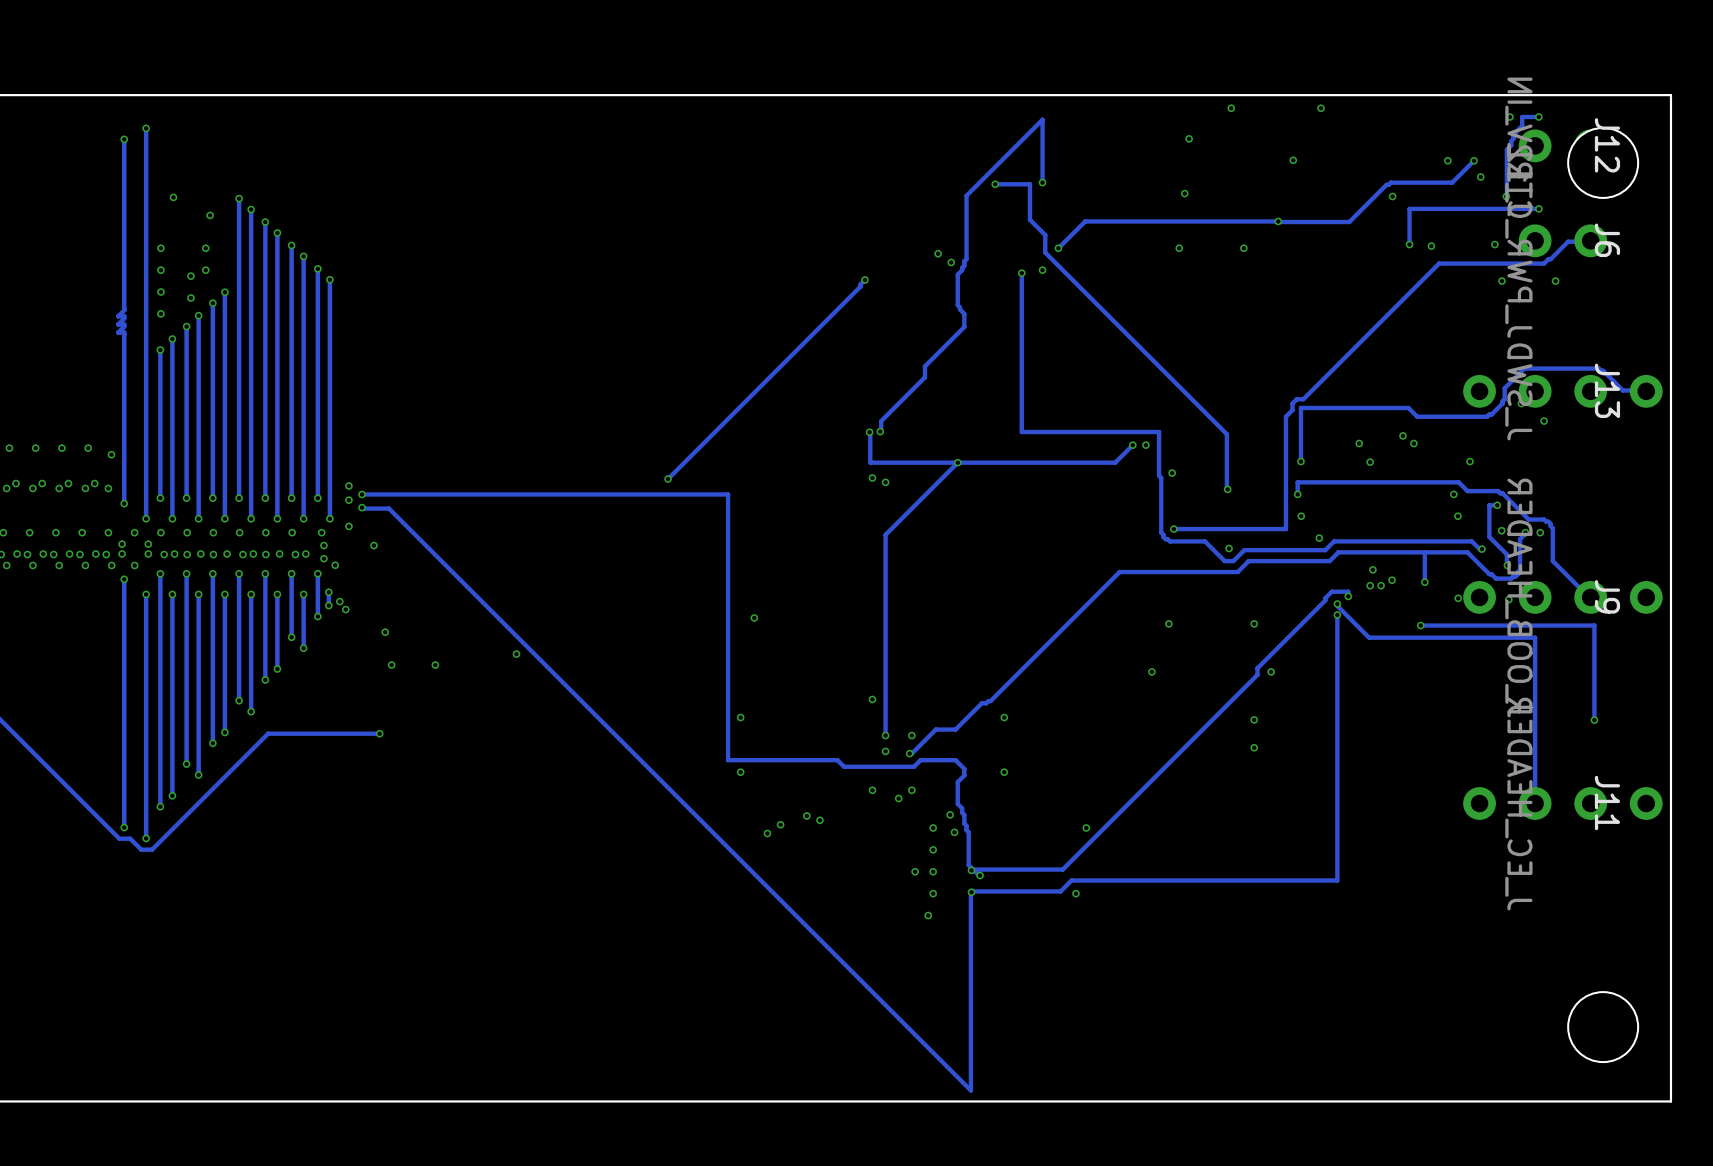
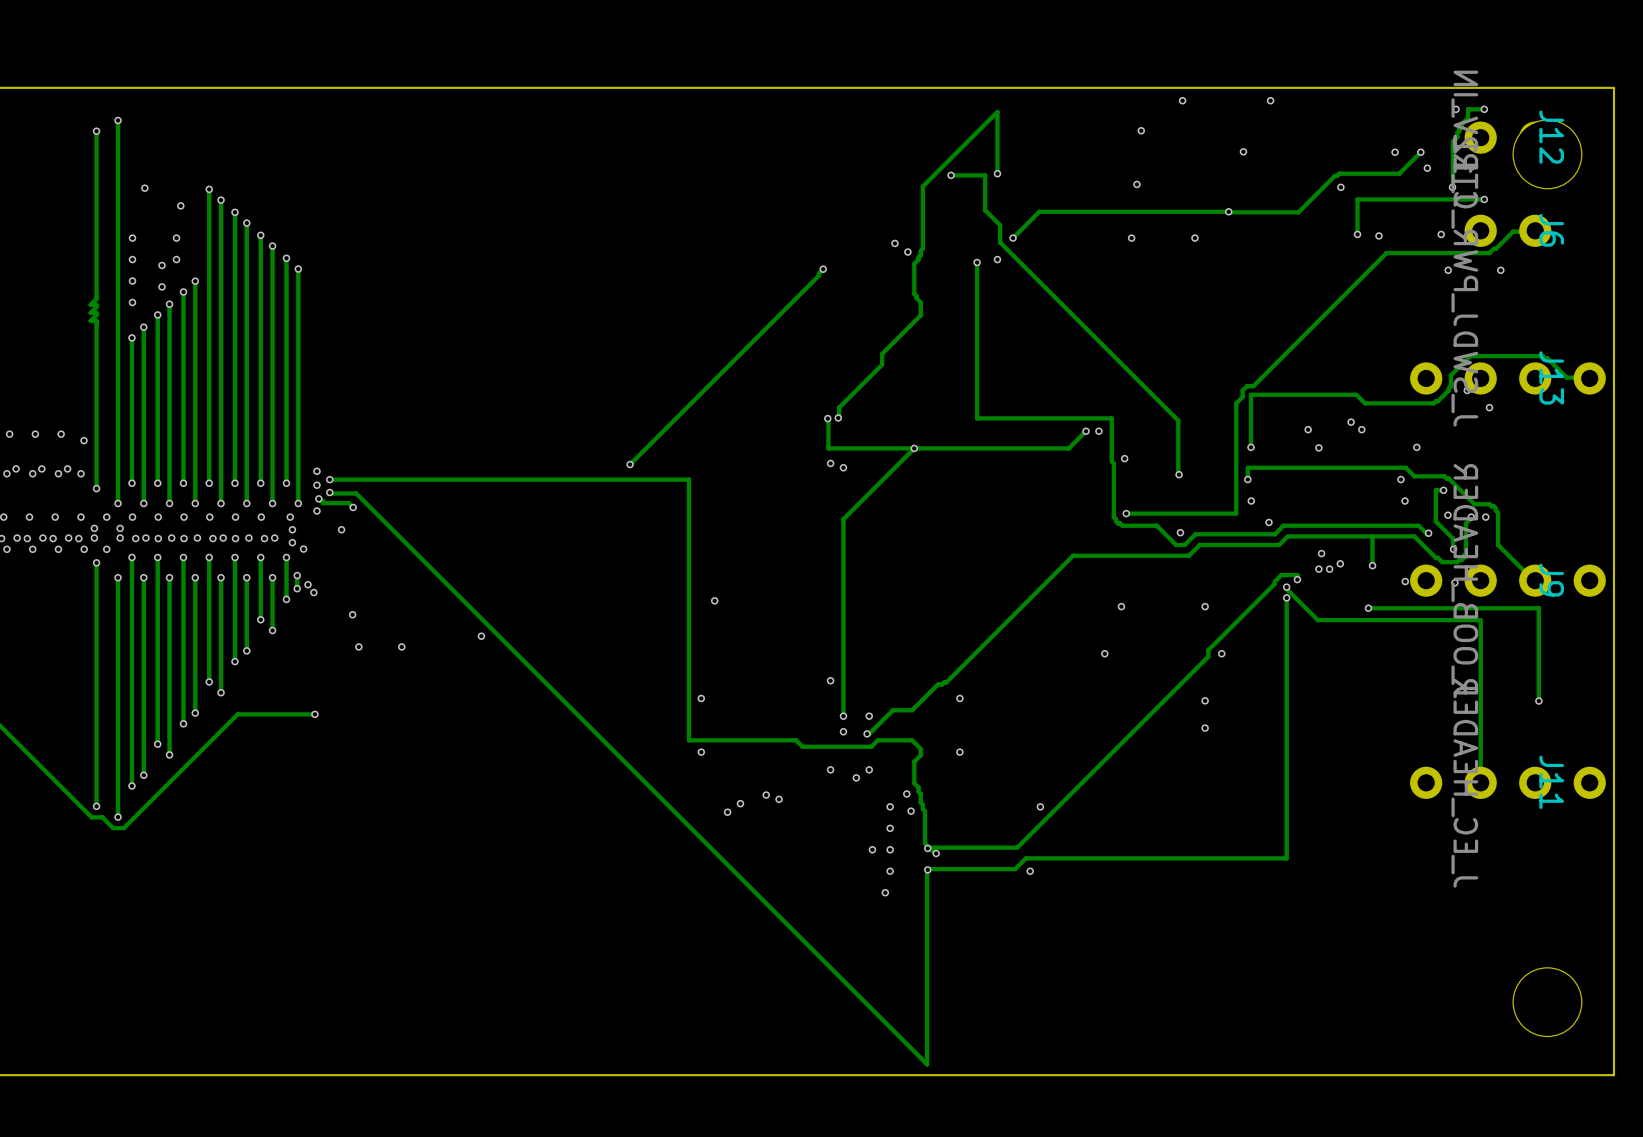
track: none -> (318, 498) (323, 501) (323, 503) (348, 503) (353, 507)
via: none -> (318, 498)
via: none -> (353, 507)
track: (379, 733) (346, 733) -> none
via position: (379, 733) -> (314, 714)

